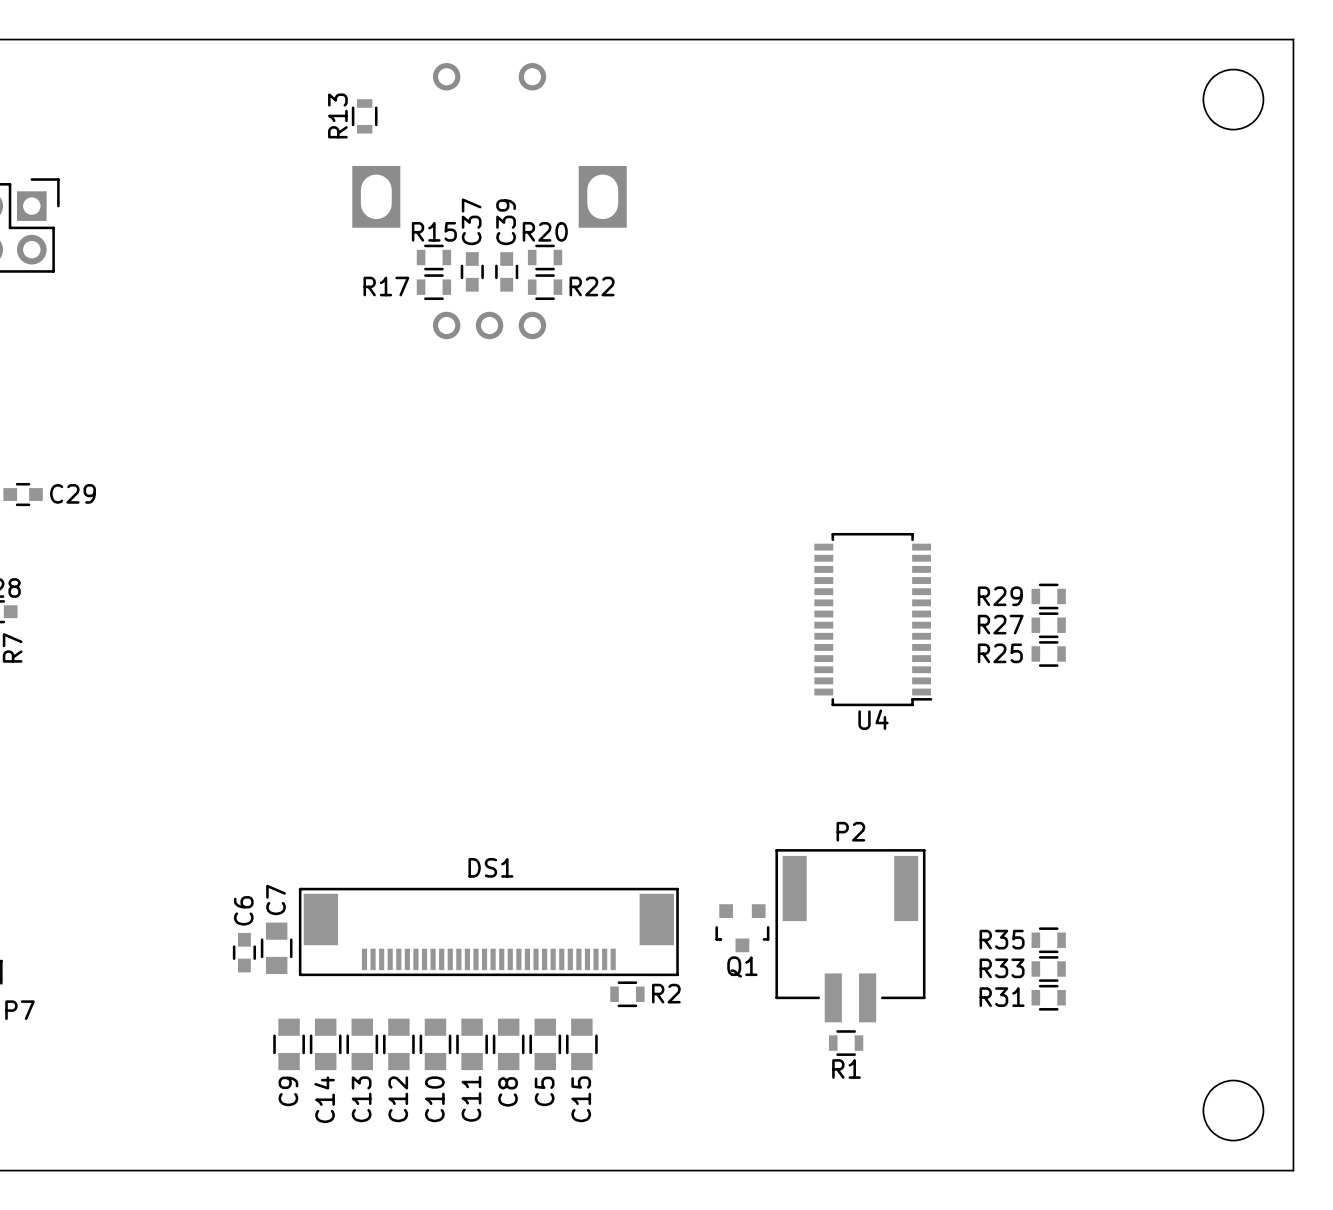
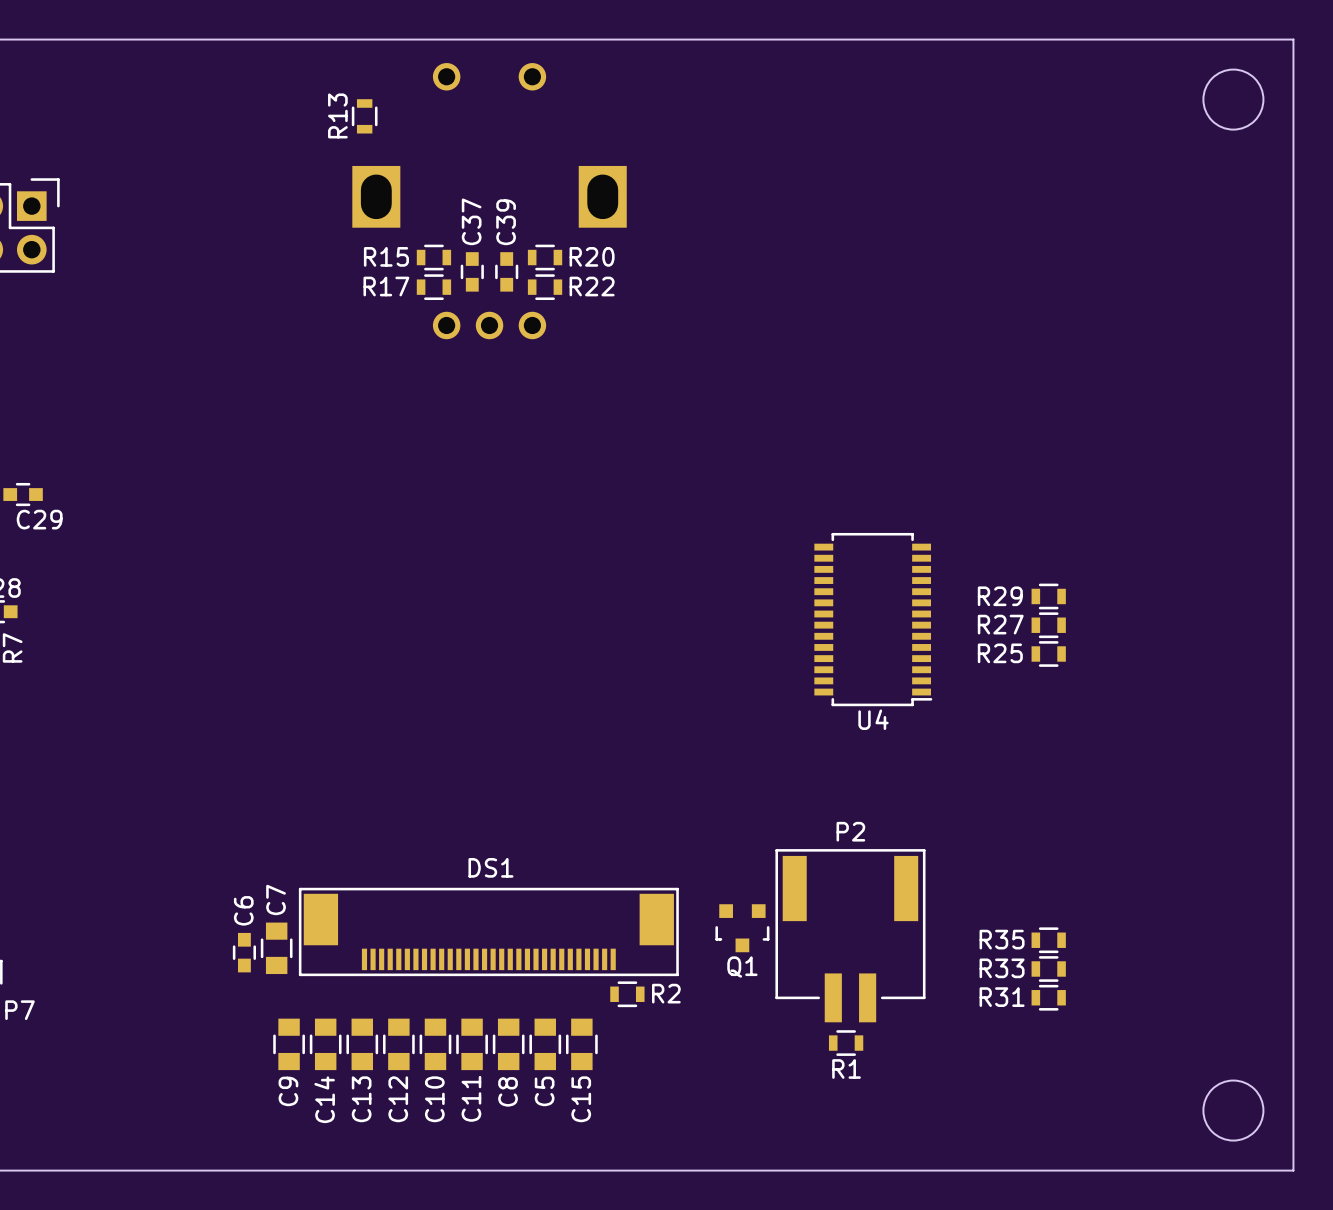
R15 name position: R15 (434, 231) -> R15 (386, 256)
R20 name position: R20 (545, 231) -> R20 (592, 256)
C29 name position: C29 (72, 493) -> C29 (39, 519)

